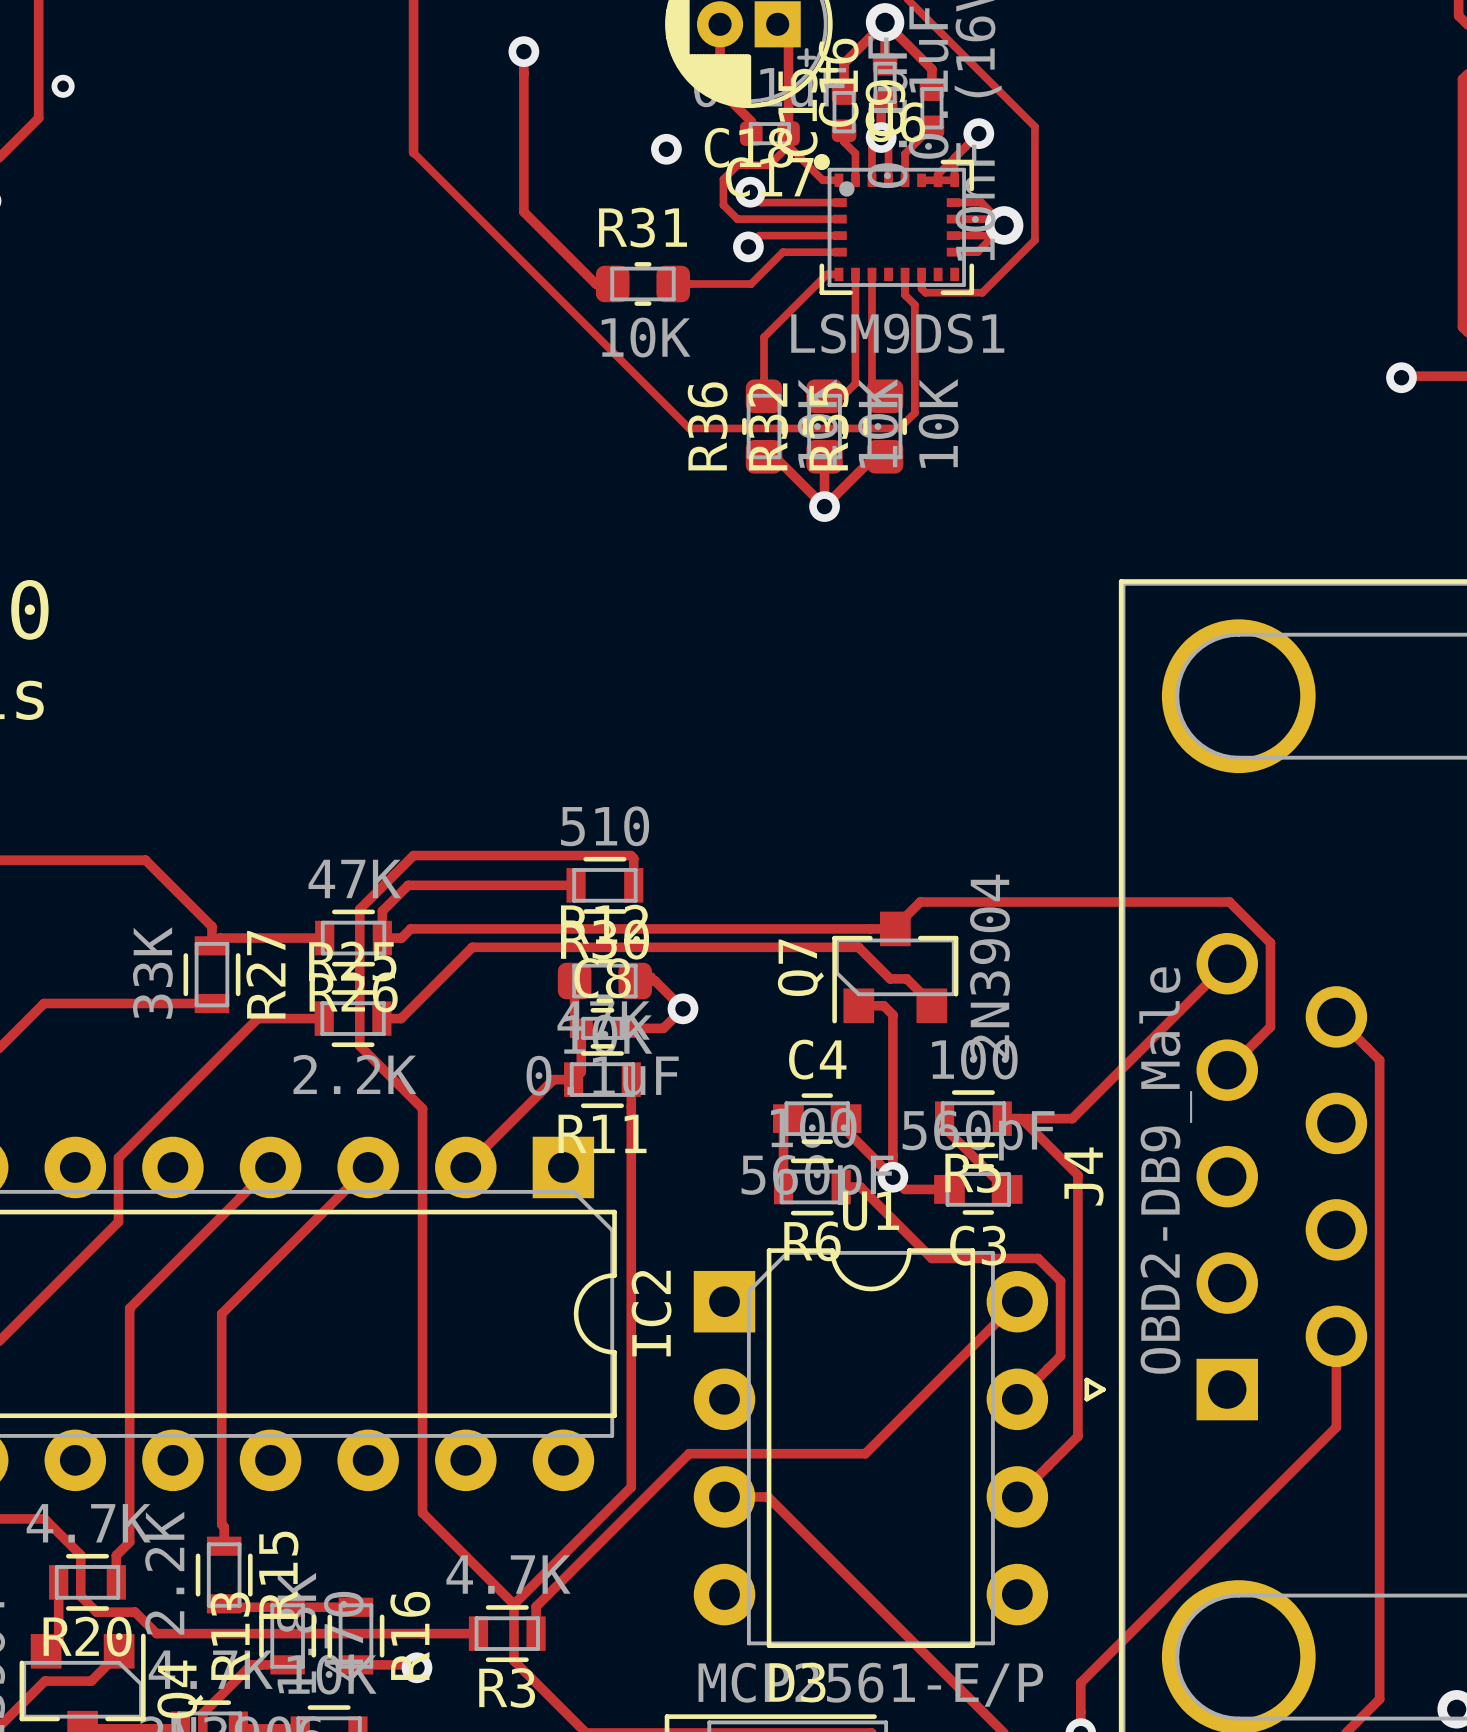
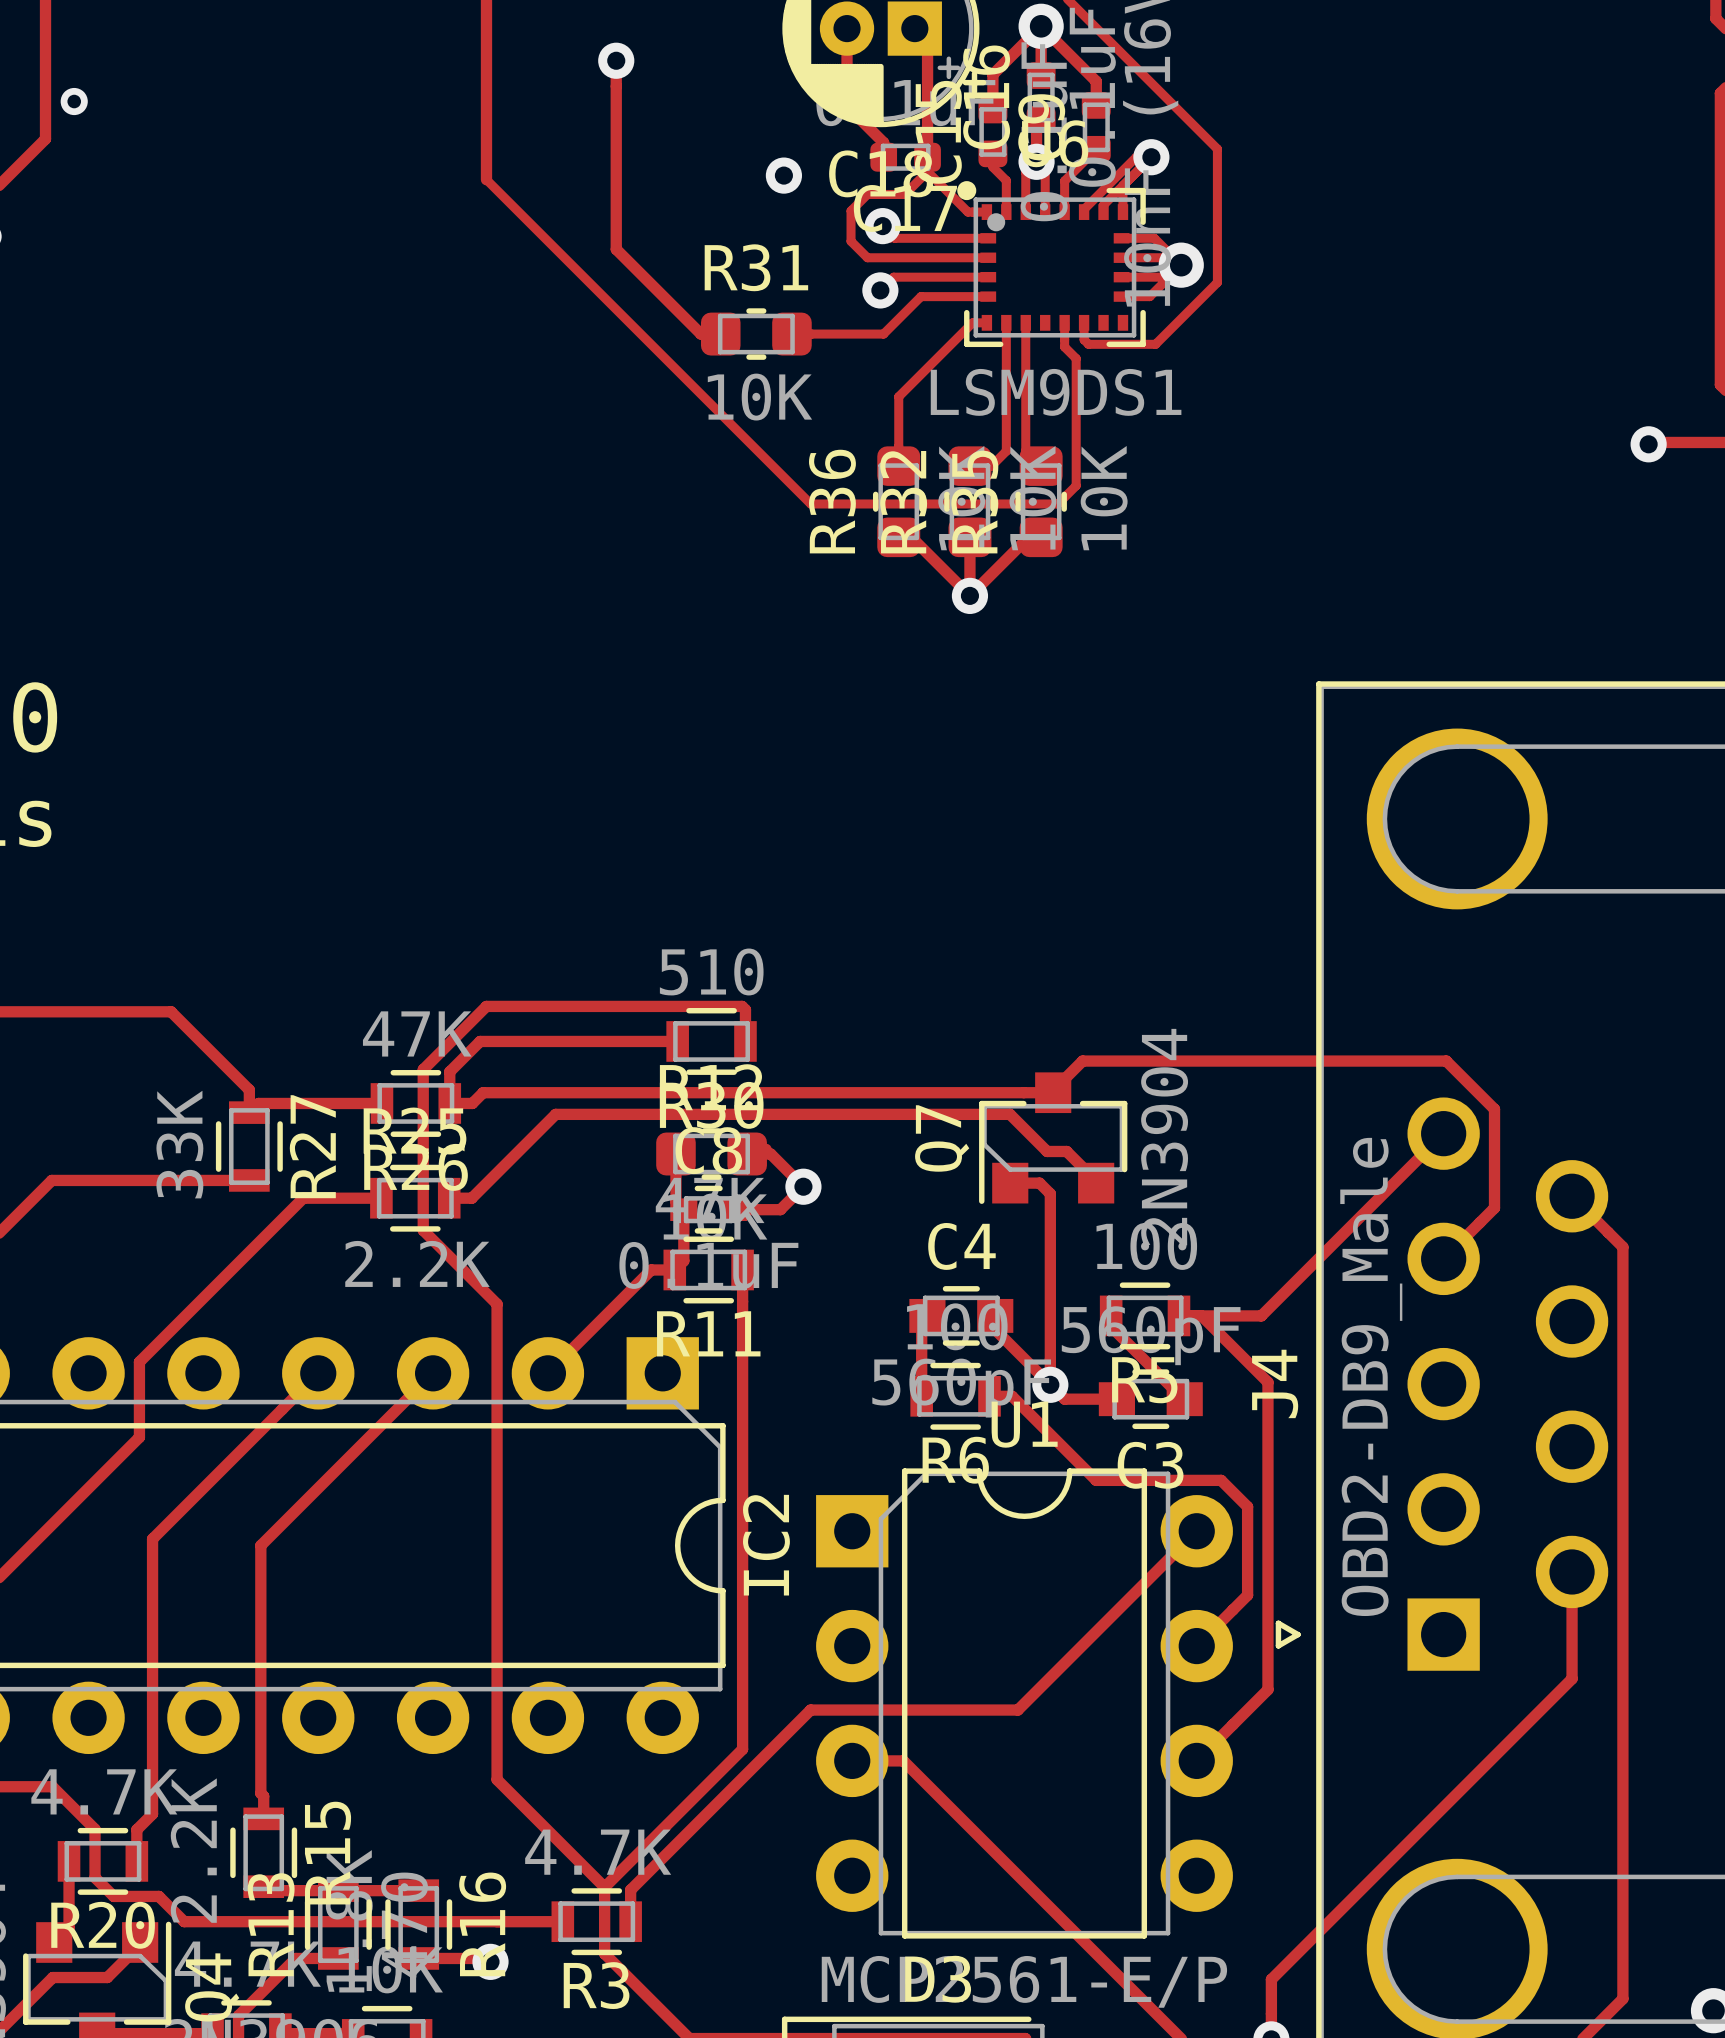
track: none -> (1151, 157) (1136, 157) (1084, 209)
track: (921, 180) (954, 180) -> none

